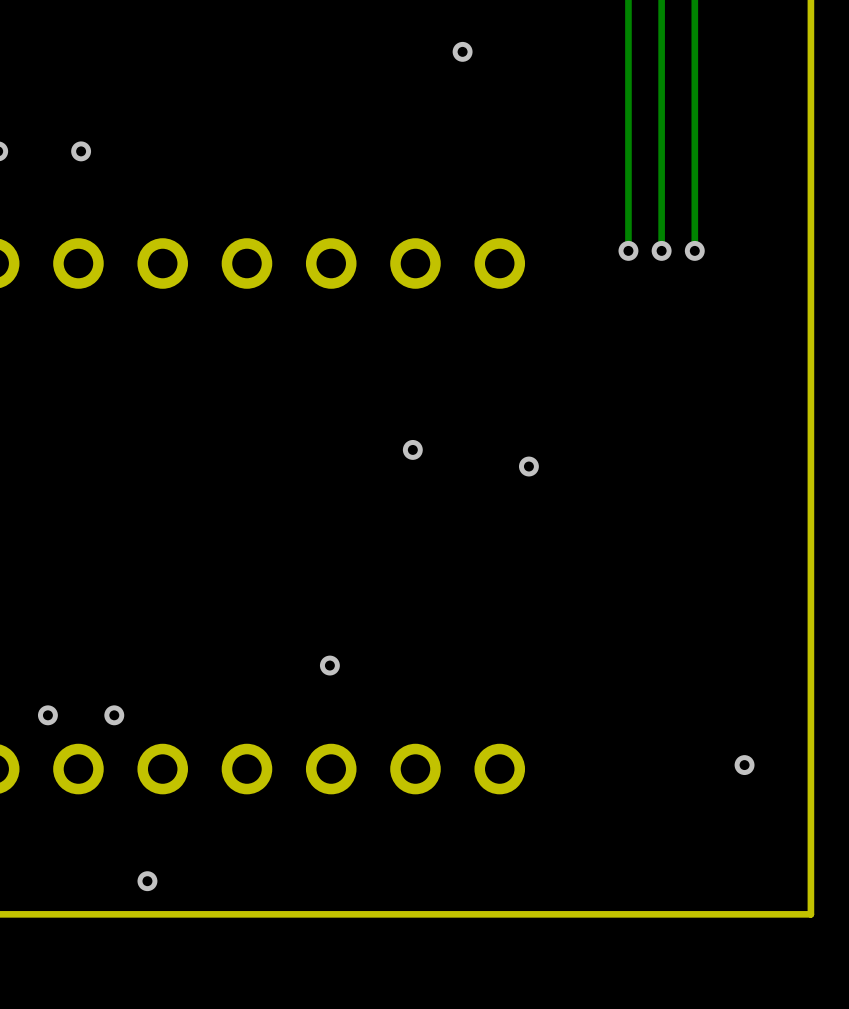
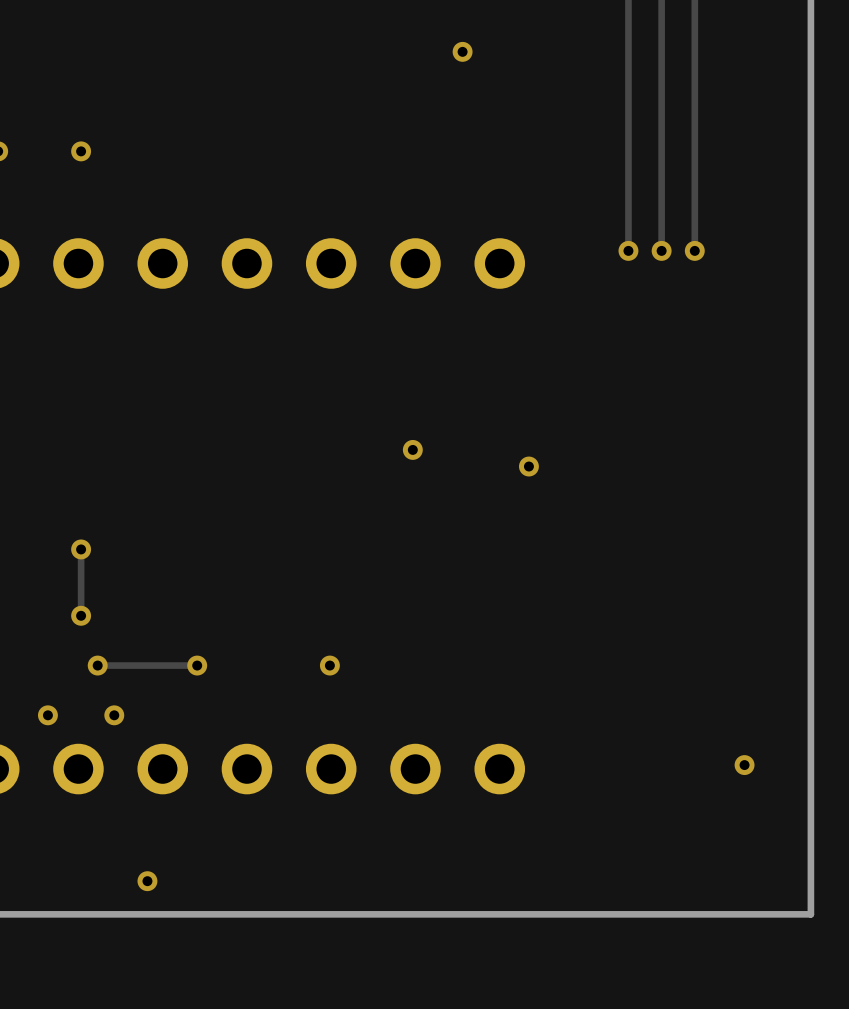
track: none -> (81, 549) (81, 615)
via: none -> (81, 549)
via: none -> (81, 615)
via: none -> (97, 665)
track: none -> (197, 665) (97, 665)
via: none -> (197, 665)

